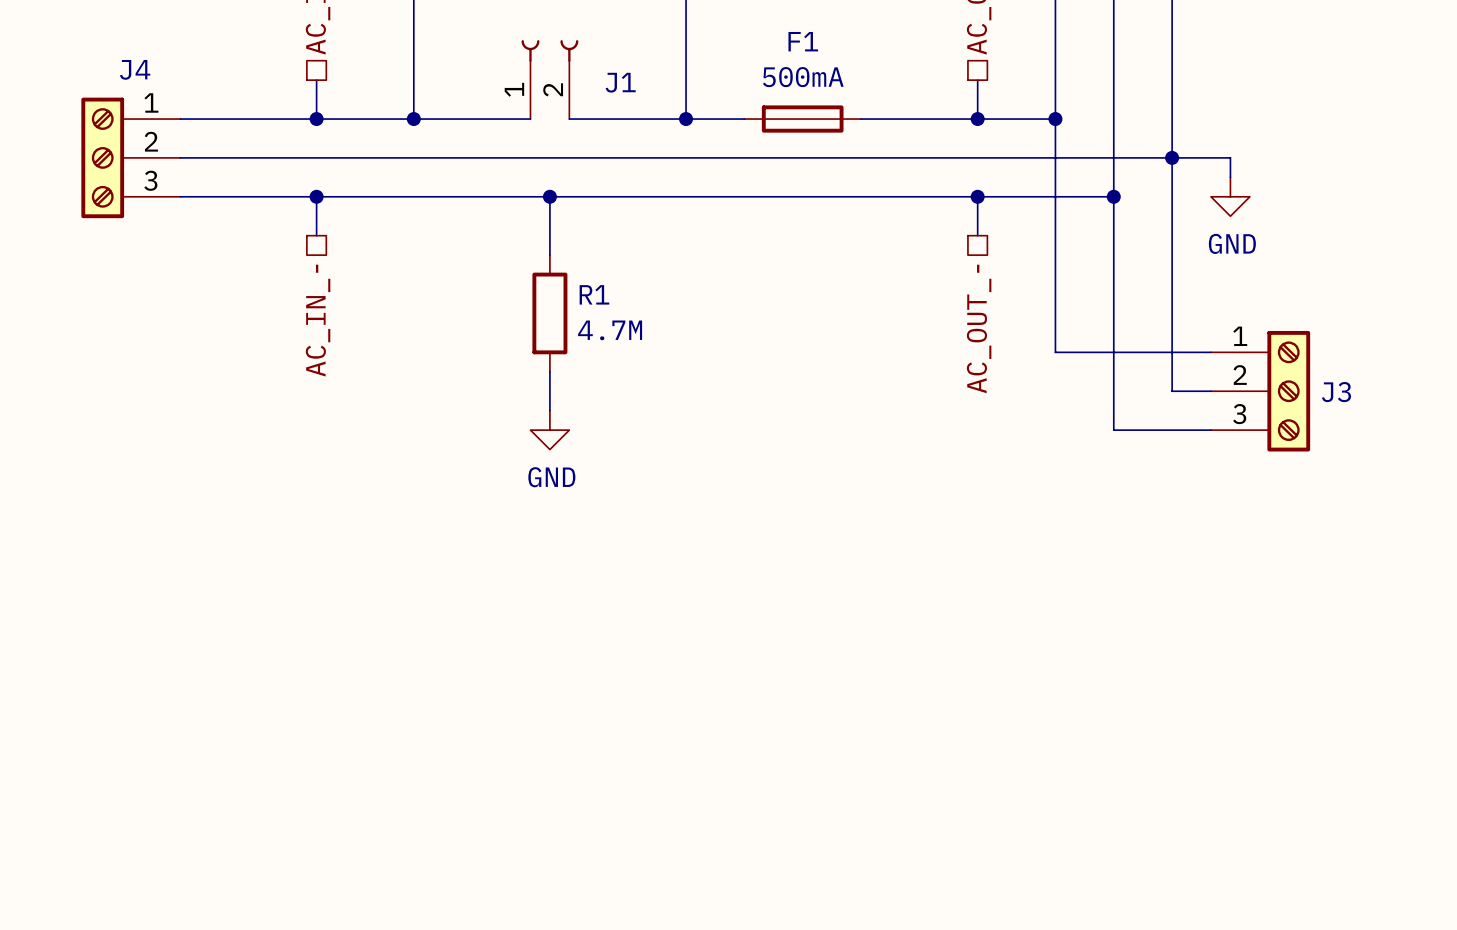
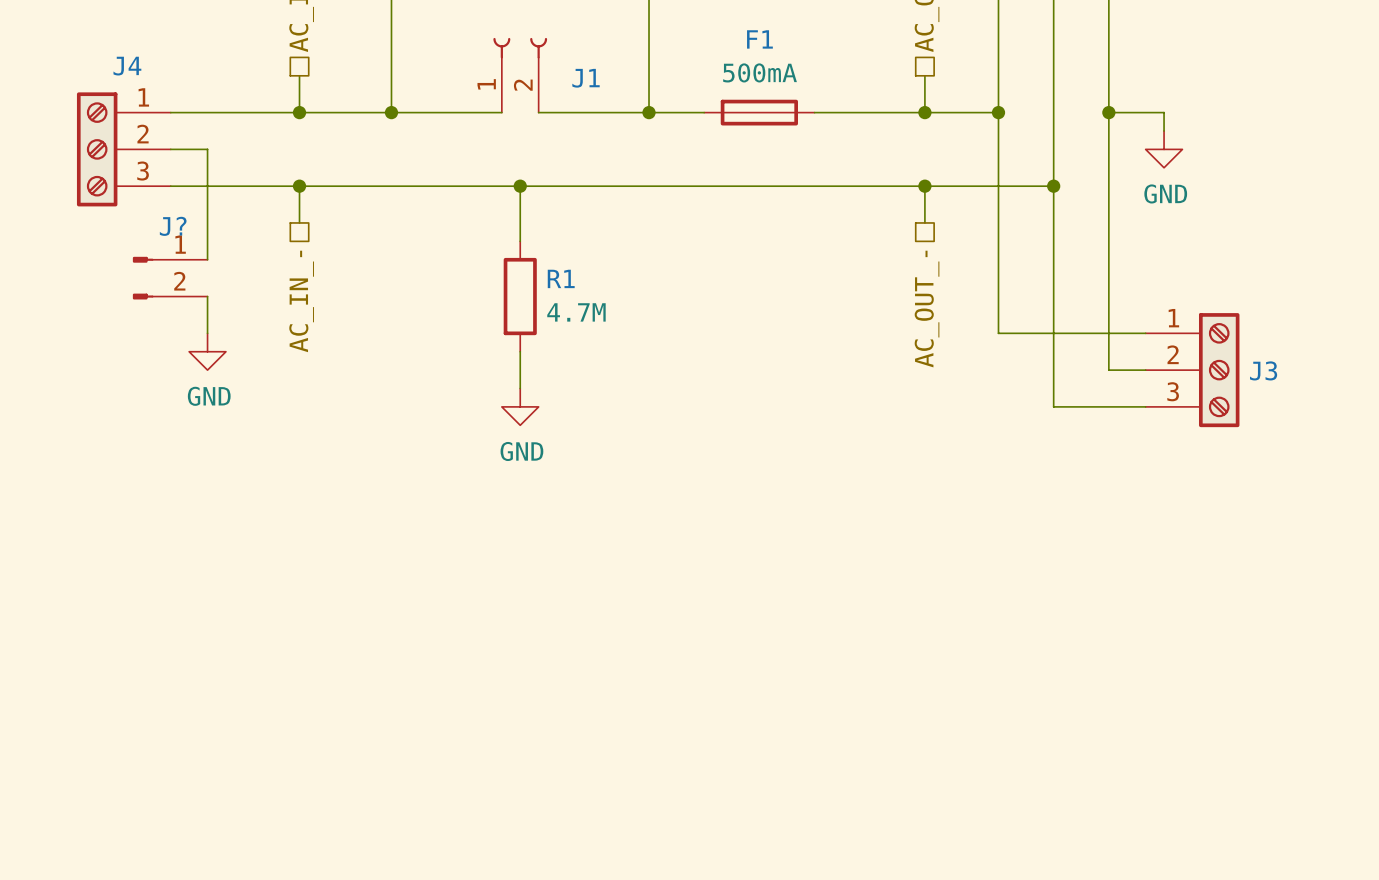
wire: none -> (1108, 112) (1164, 112) (1164, 131)
wire: (219, 157) (1230, 157) (1230, 177) -> (207, 149) (207, 259)
junction position: (1172, 157) -> (1108, 112)
power symbol position: GND (1230, 196) -> GND (1164, 149)
J?: none -> (170, 278)
wire: none -> (207, 296) (207, 333)
power symbol: none -> GND (207, 351)

